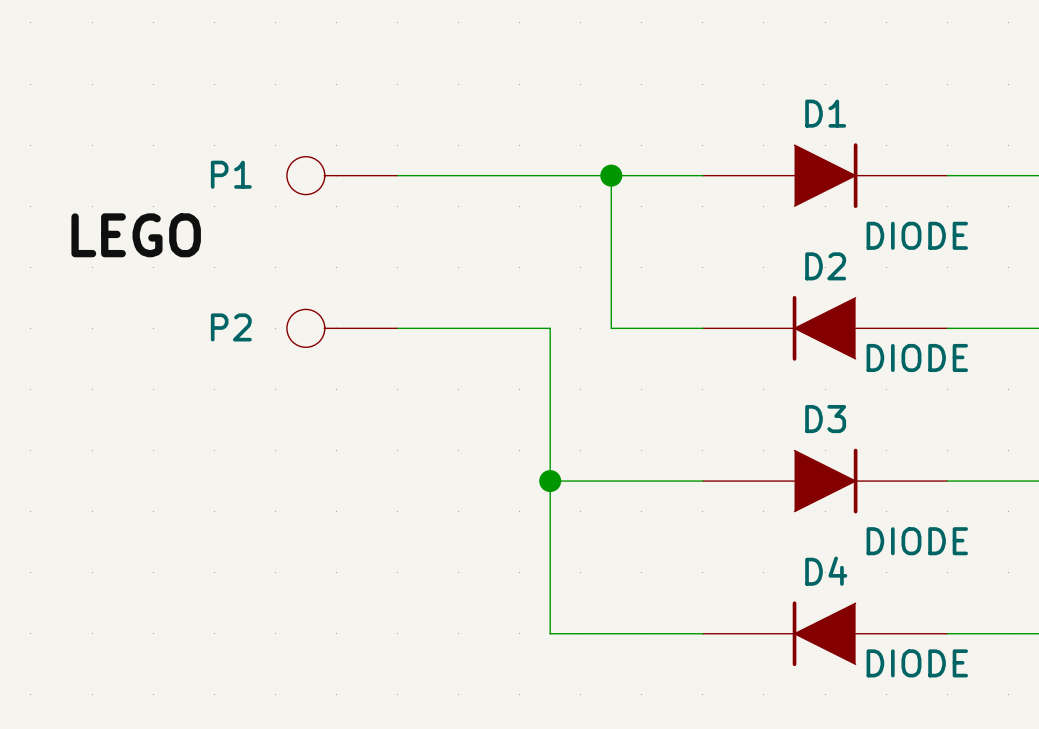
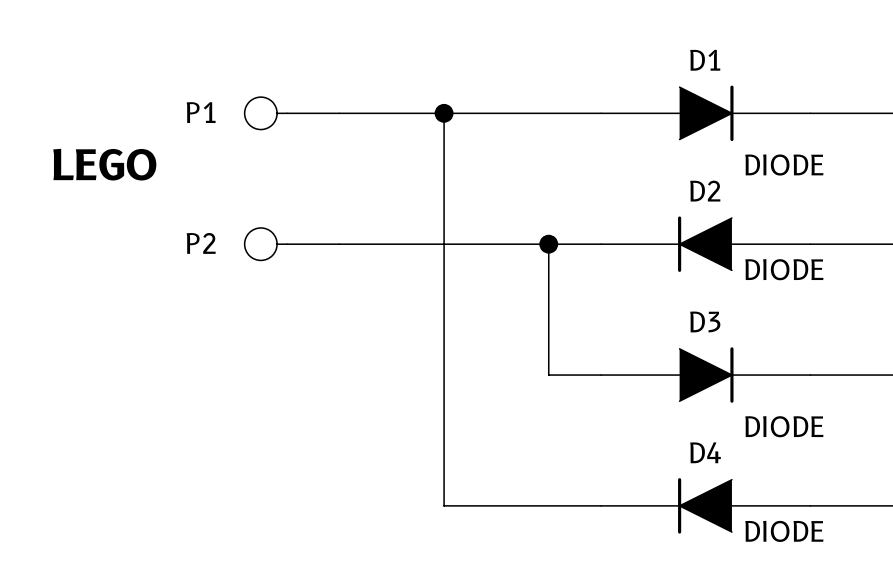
junction: none -> (444, 113)
wire: (611, 175) (611, 328) -> (470, 244) (522, 244)
junction: (611, 175) -> none
wire: (550, 328) (550, 633) -> (444, 113) (444, 505) (470, 505)
junction: none -> (548, 244)
wire: (550, 481) (641, 481) -> (548, 244) (548, 375)
junction: (550, 481) -> none

